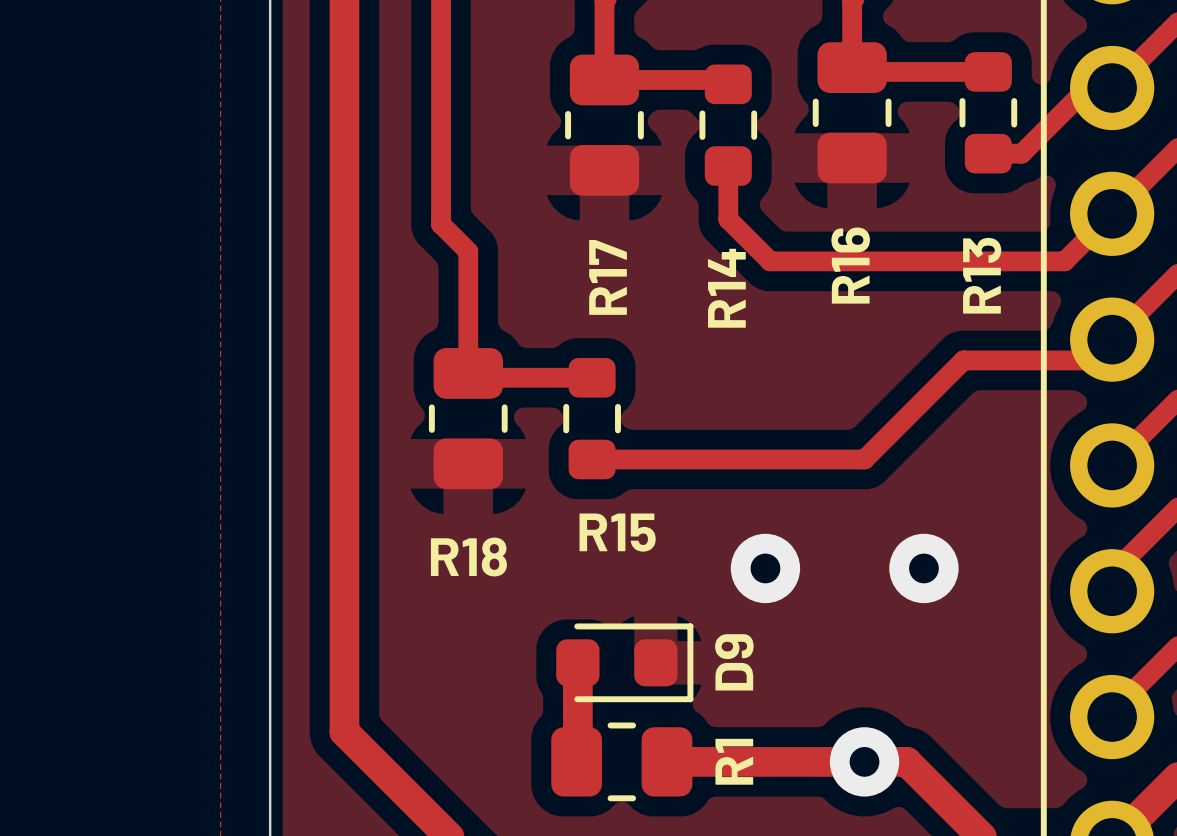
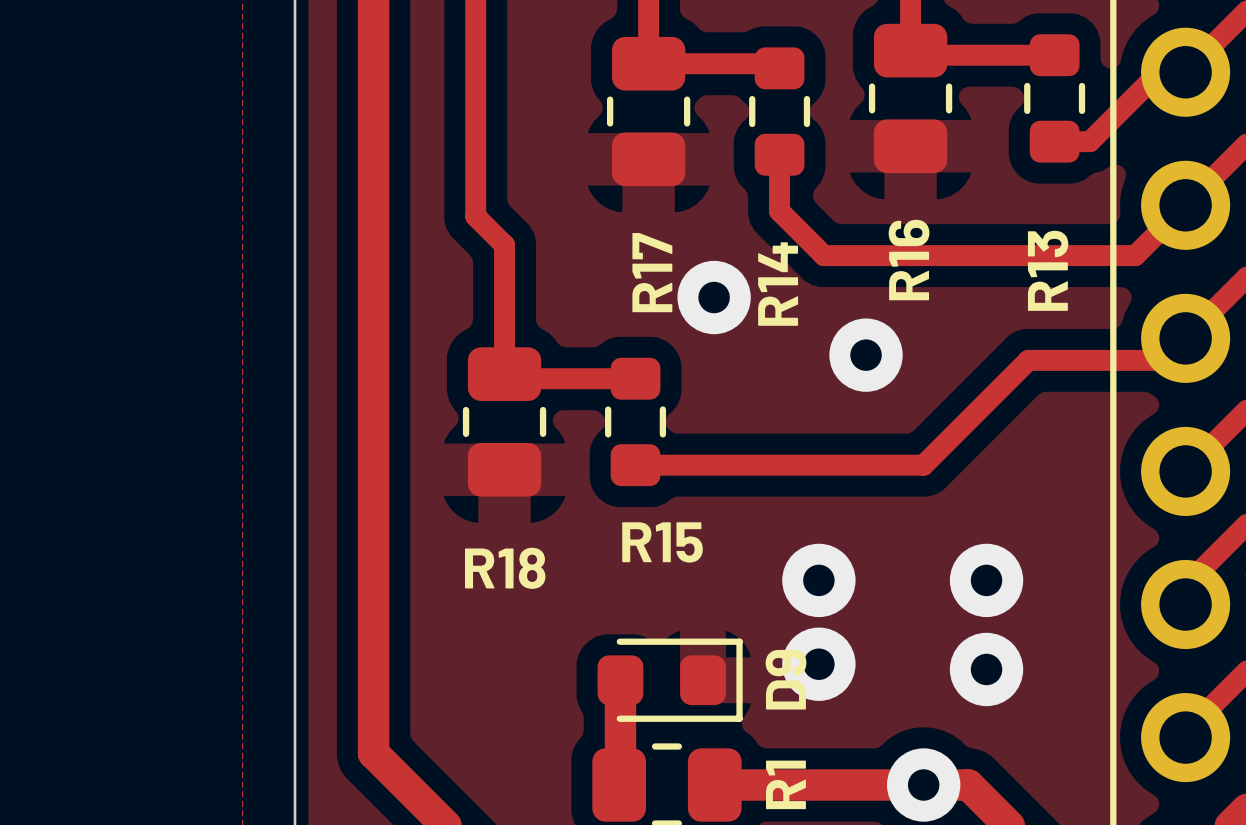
via: none -> (714, 297)
via: none -> (866, 355)
via: none -> (818, 664)
via: none -> (986, 669)

